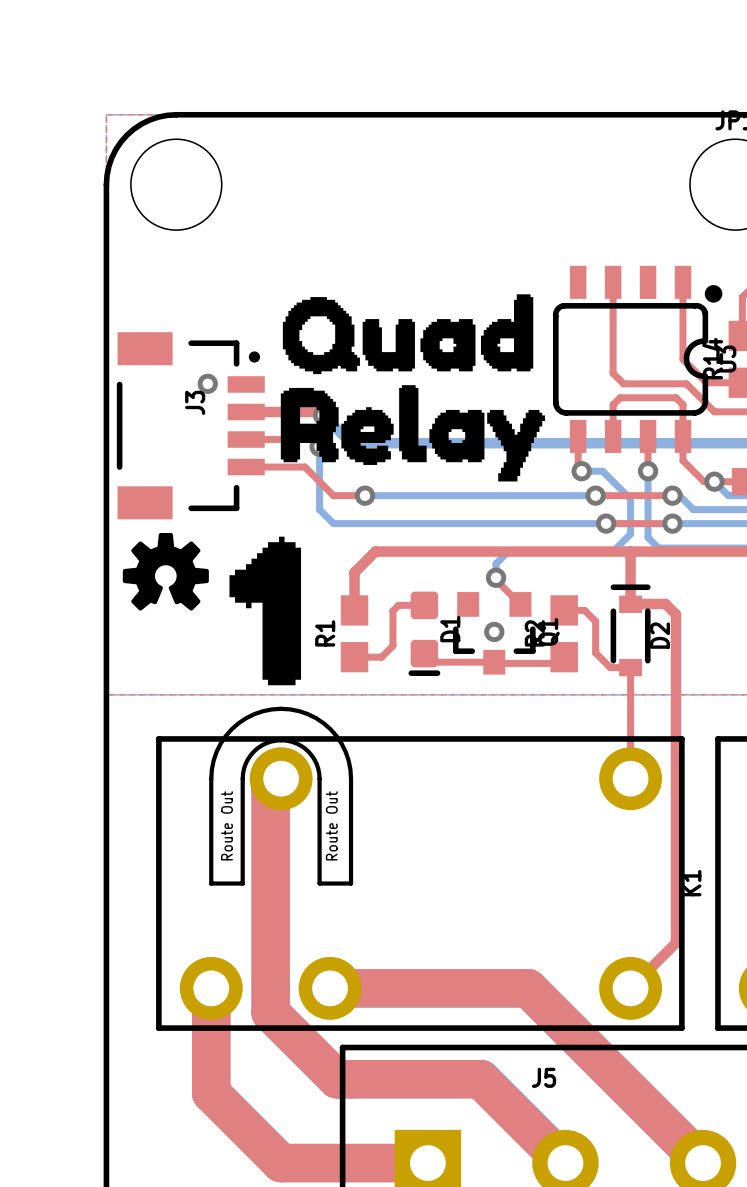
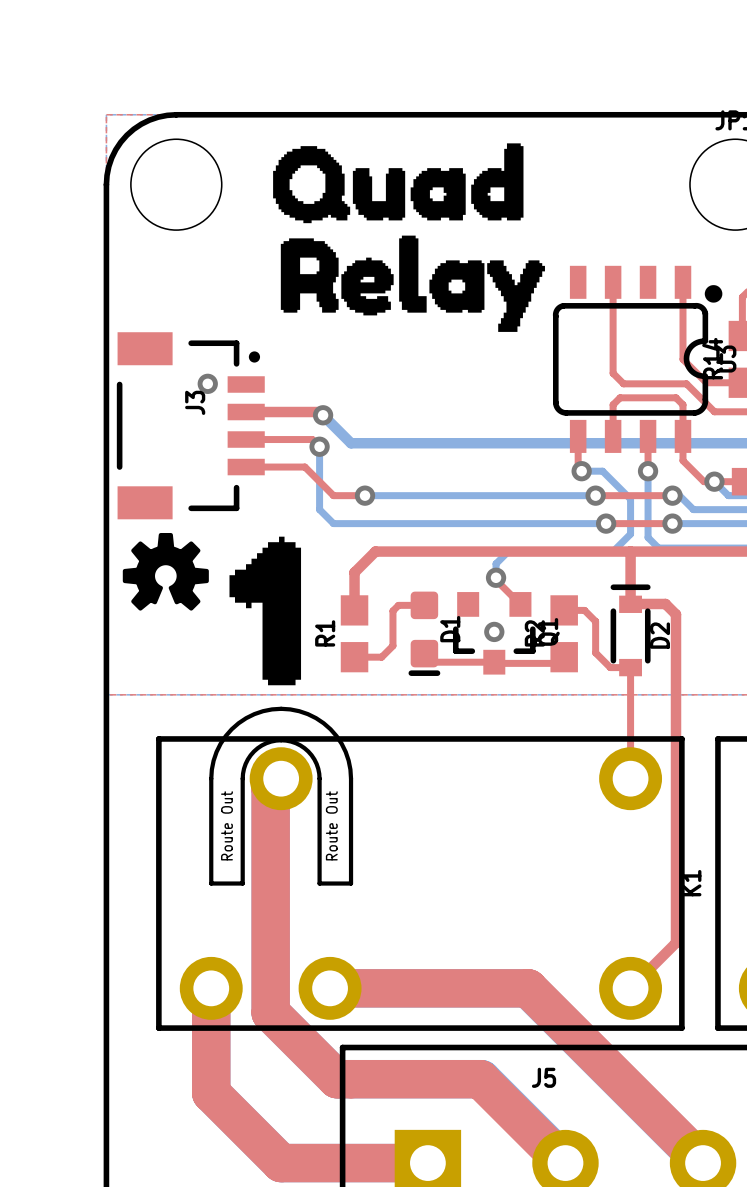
drawing position: (408, 334) -> (398, 183)
drawing position: (412, 433) -> (412, 283)

